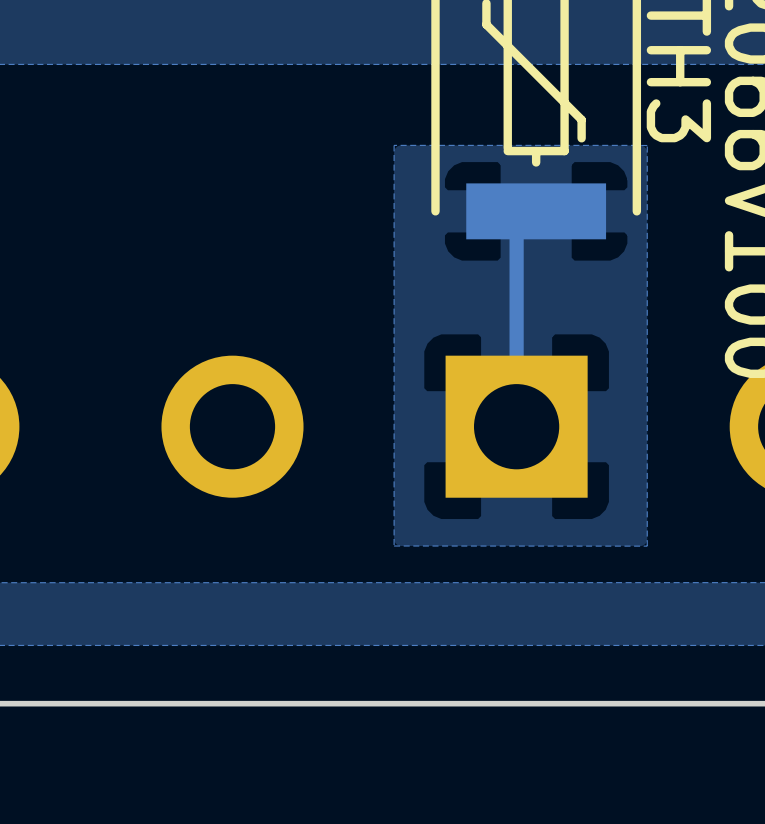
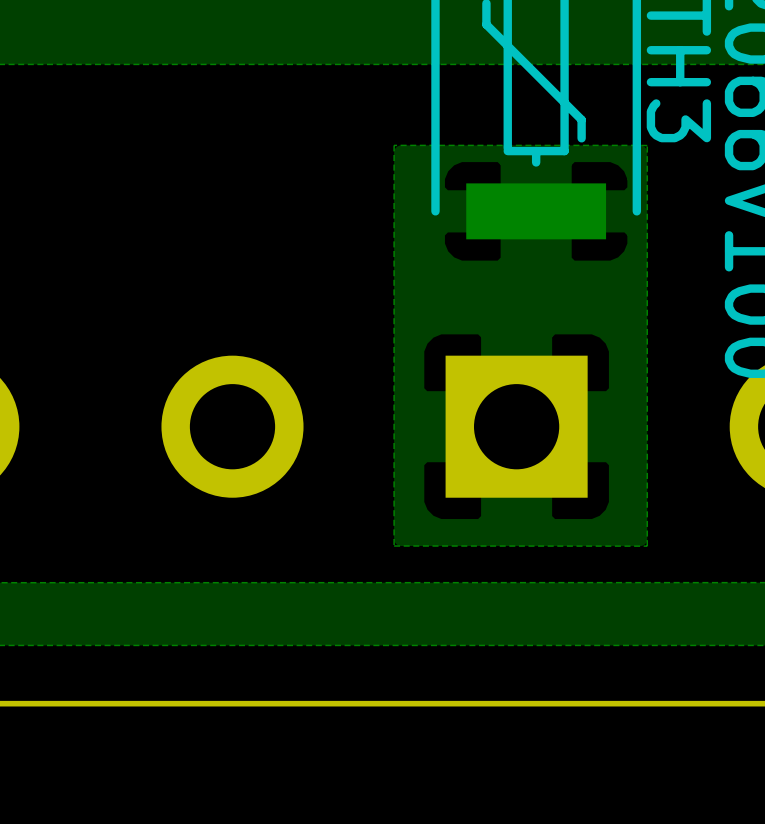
track: (536, 211) (516, 230) (516, 426) -> none

